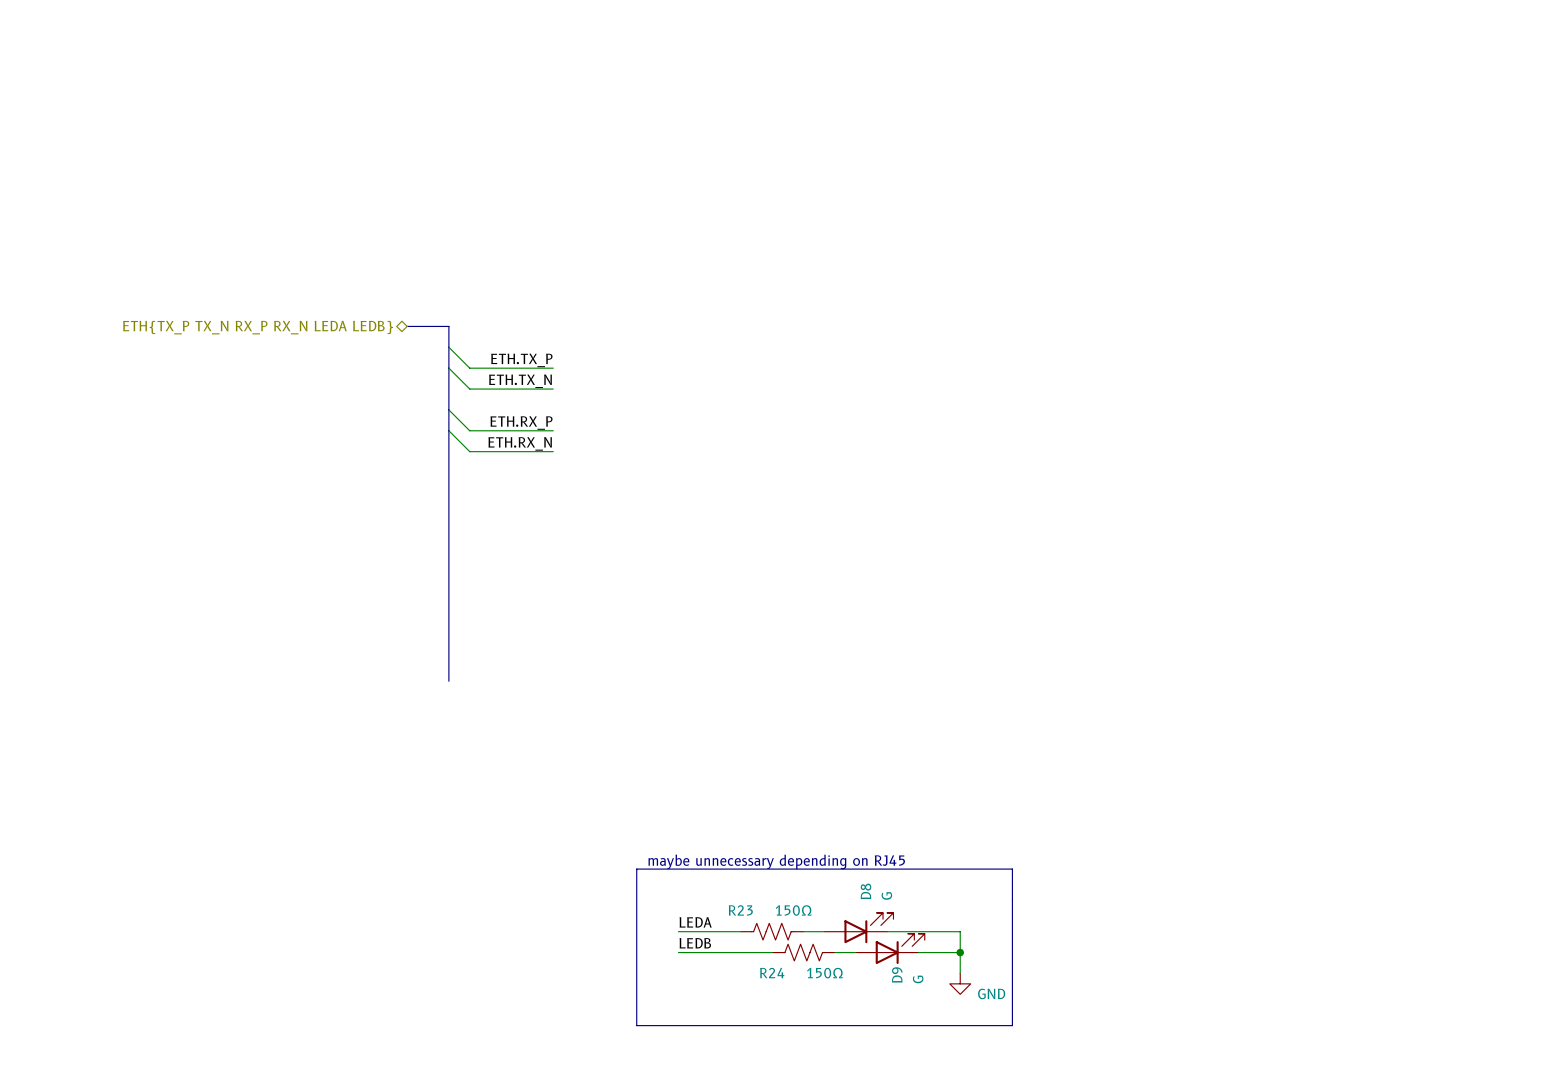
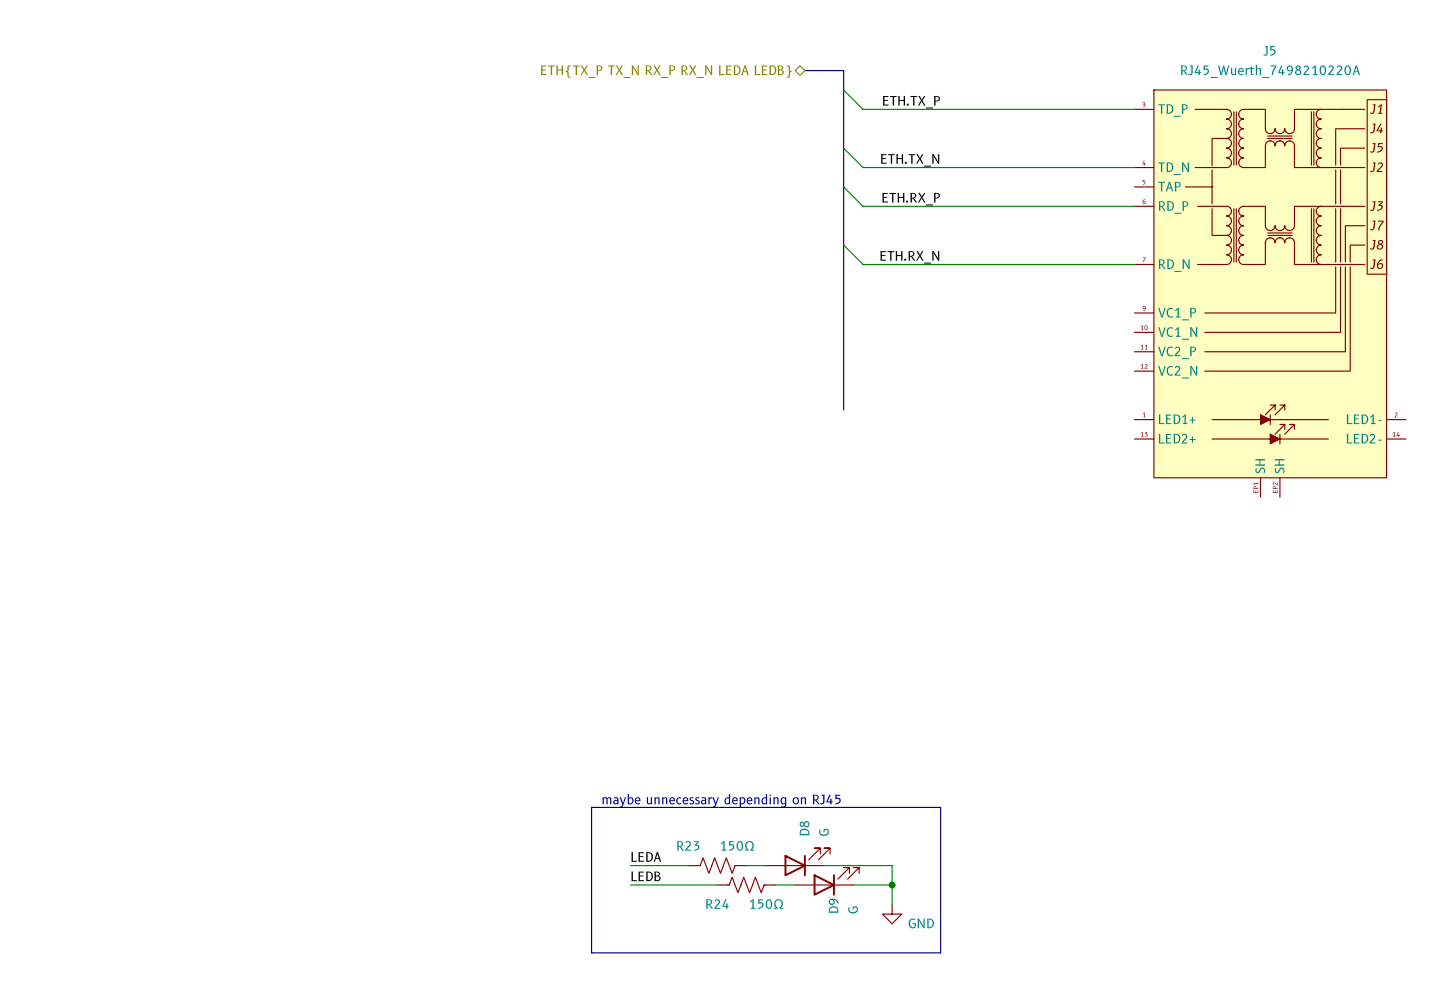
bus: none -> (804, 70) (843, 70) (843, 409)
hierarchical label: none -> ETH{TX_P TX_N RX_P RX_N LEDA LEDB} (666, 71)
wire: none -> (843, 89) (863, 109) (1134, 109)
label: none -> ETH.TX_P (911, 102)
wire: none -> (843, 148) (863, 167) (1134, 167)
label: none -> ETH.TX_N (910, 160)
wire: none -> (843, 186) (863, 206) (1134, 206)
label: none -> ETH.RX_P (911, 199)
wire: none -> (843, 245) (863, 264) (1134, 264)
label: none -> ETH.RX_N (909, 257)
J5: none -> RJ45_Wuerth_7498210220A (1270, 293)
bus: (407, 326) (448, 326) (448, 681) -> none
hierarchical label: ETH{TX_P TX_N RX_P RX_N LEDA LEDB} (258, 327) -> none
wire: (448, 347) (469, 368) (553, 368) -> none
label: ETH.TX_P (521, 360) -> none
wire: (448, 368) (469, 389) (553, 389) -> none
label: ETH.TX_N (520, 381) -> none
wire: (448, 409) (469, 430) (553, 430) -> none
label: ETH.RX_P (521, 423) -> none
wire: (448, 430) (469, 451) (553, 451) -> none
label: ETH.RX_N (520, 443) -> none

